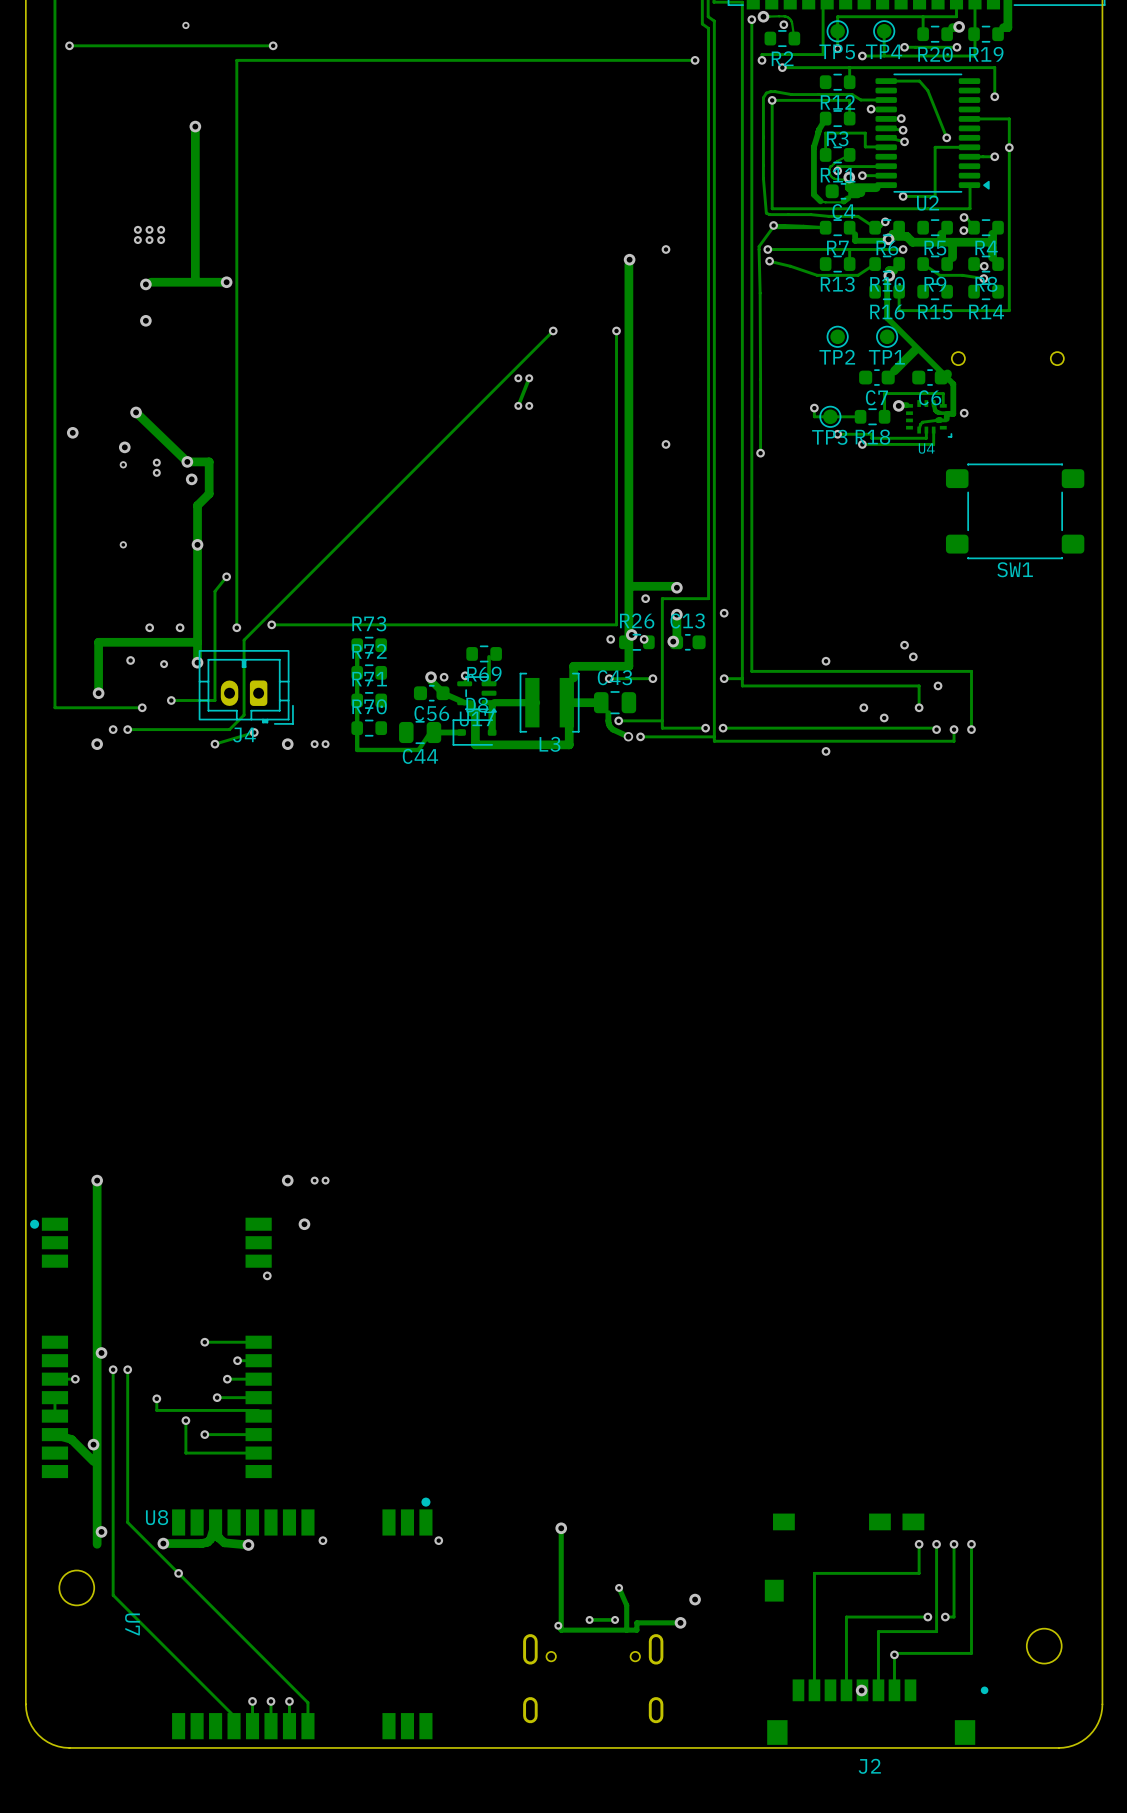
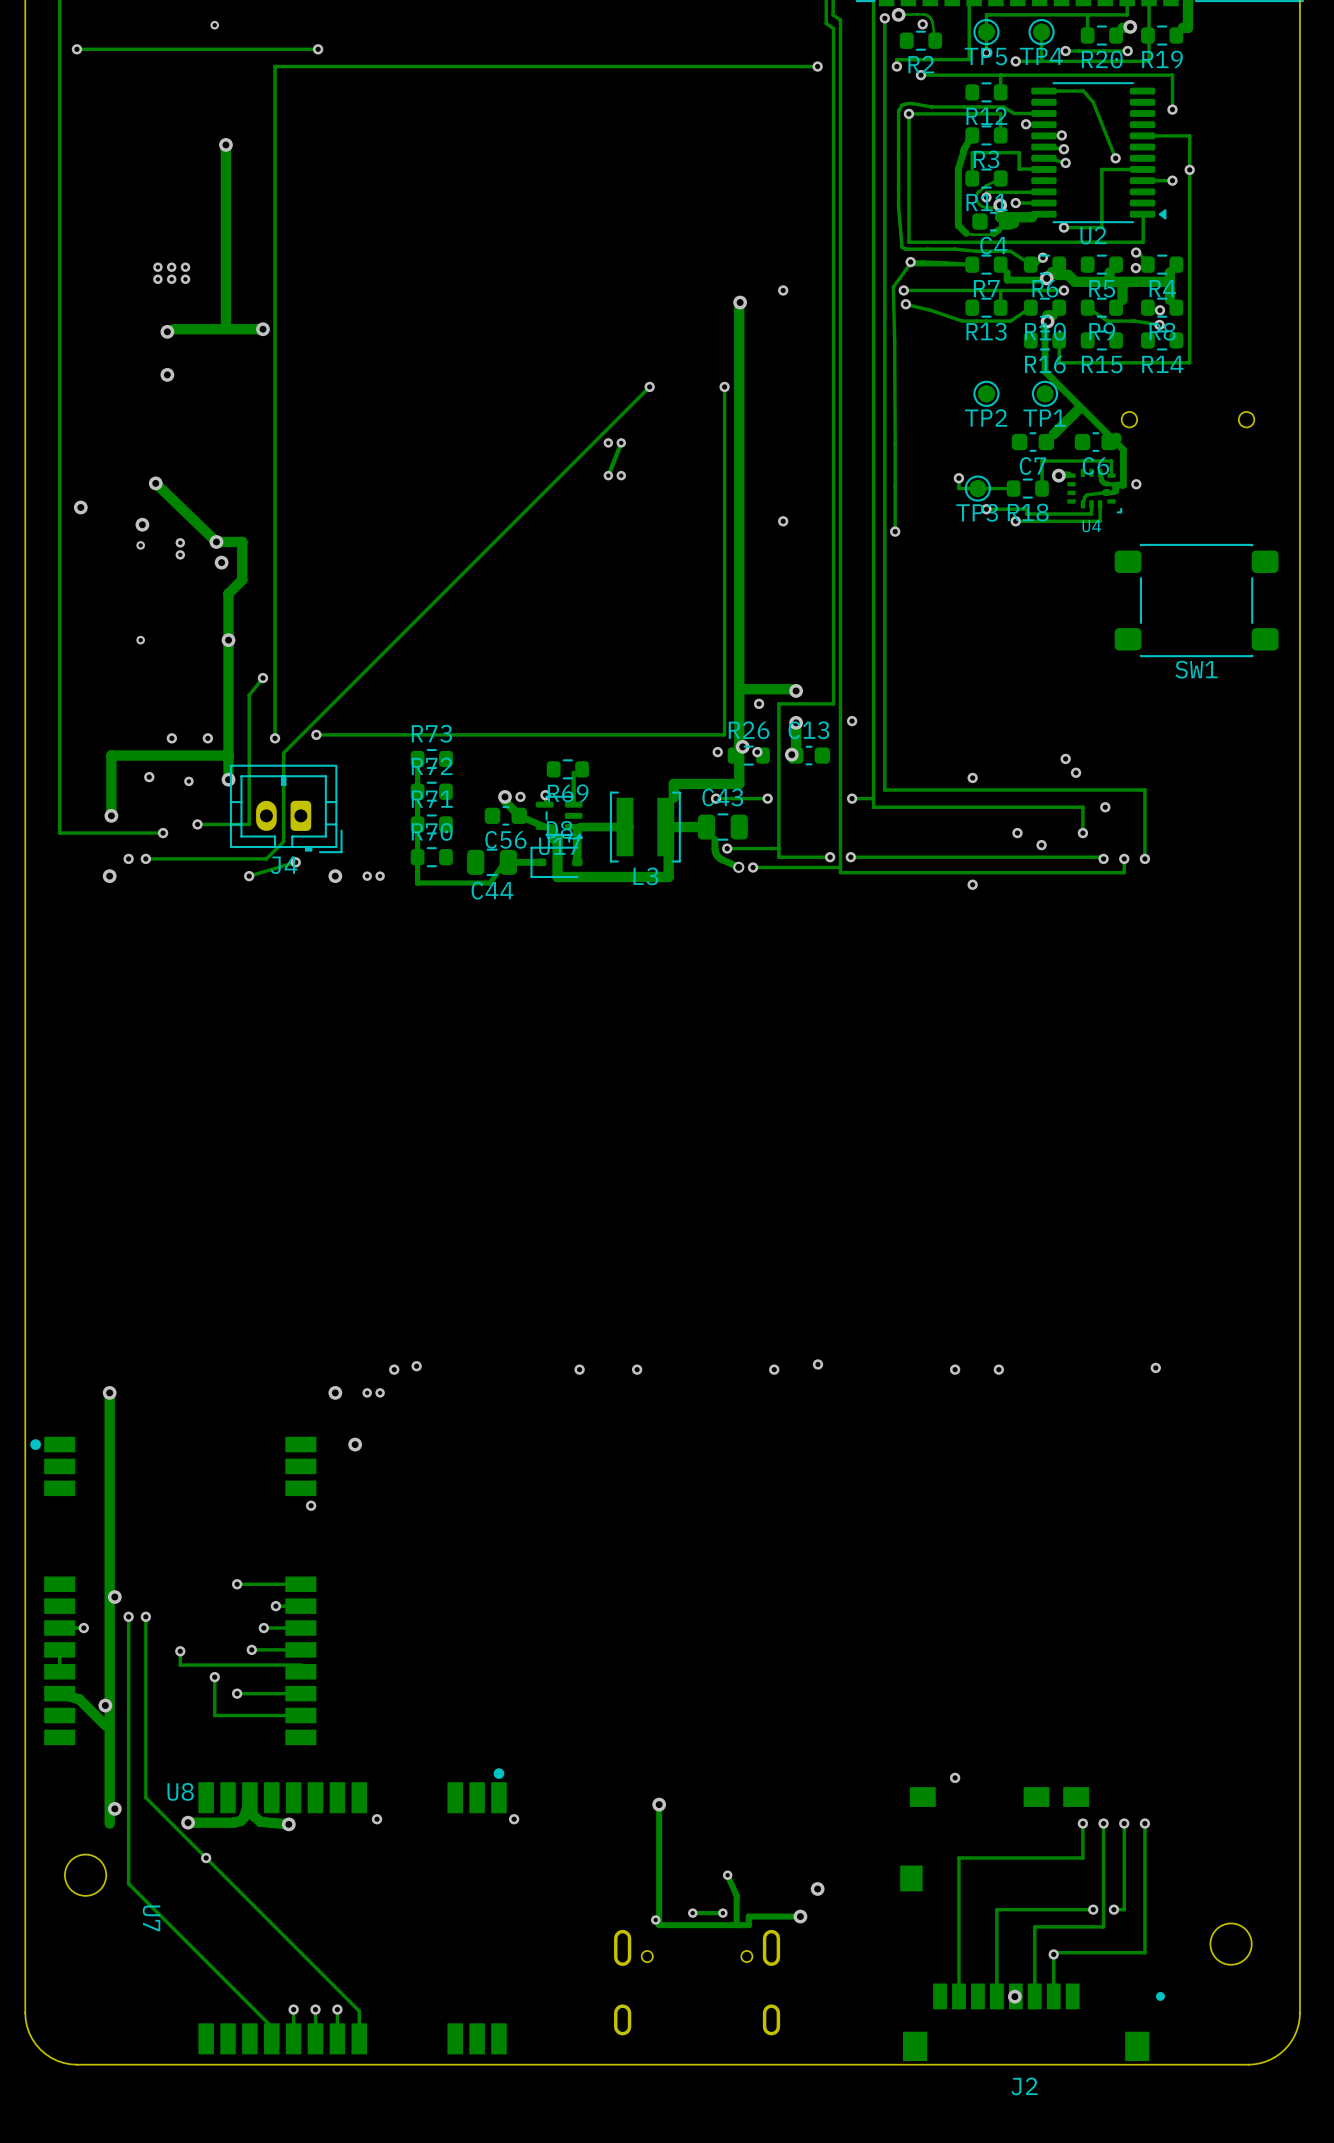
via: none -> (817, 1364)
via: none -> (416, 1366)
via: none -> (1155, 1367)
via: none -> (394, 1369)
via: none -> (579, 1369)
via: none -> (637, 1369)
via: none -> (774, 1369)
via: none -> (955, 1369)
via: none -> (998, 1369)
via: none -> (955, 1777)

